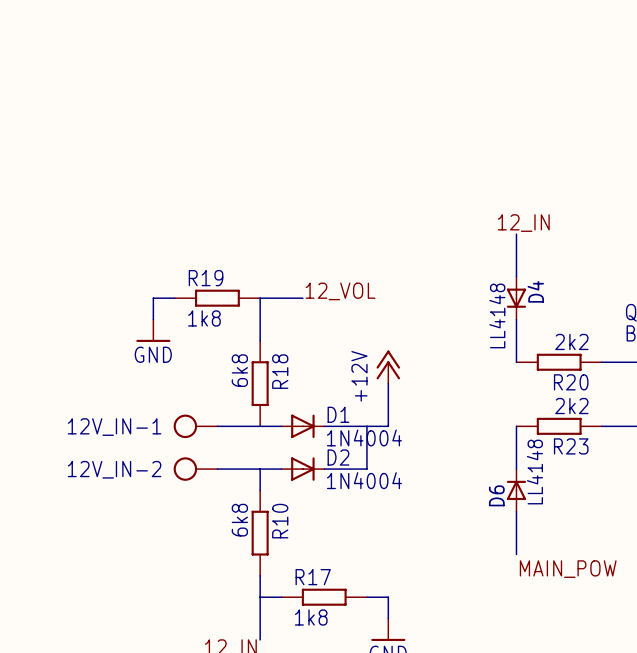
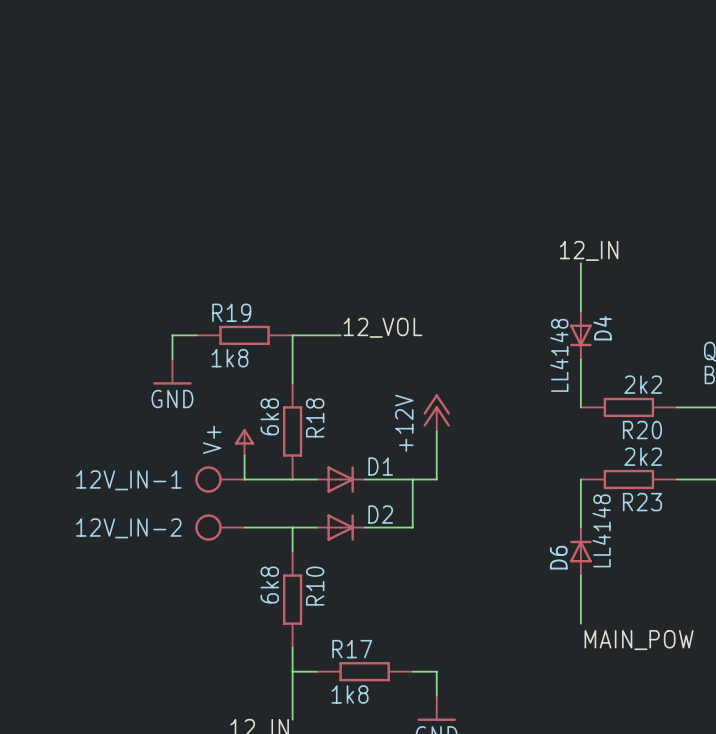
power symbol: none -> V+ (244, 442)
wire: none -> (244, 455) (244, 479)
D1 value: 1N4004 (364, 437) -> none
D2 value: 1N4004 (364, 480) -> none

